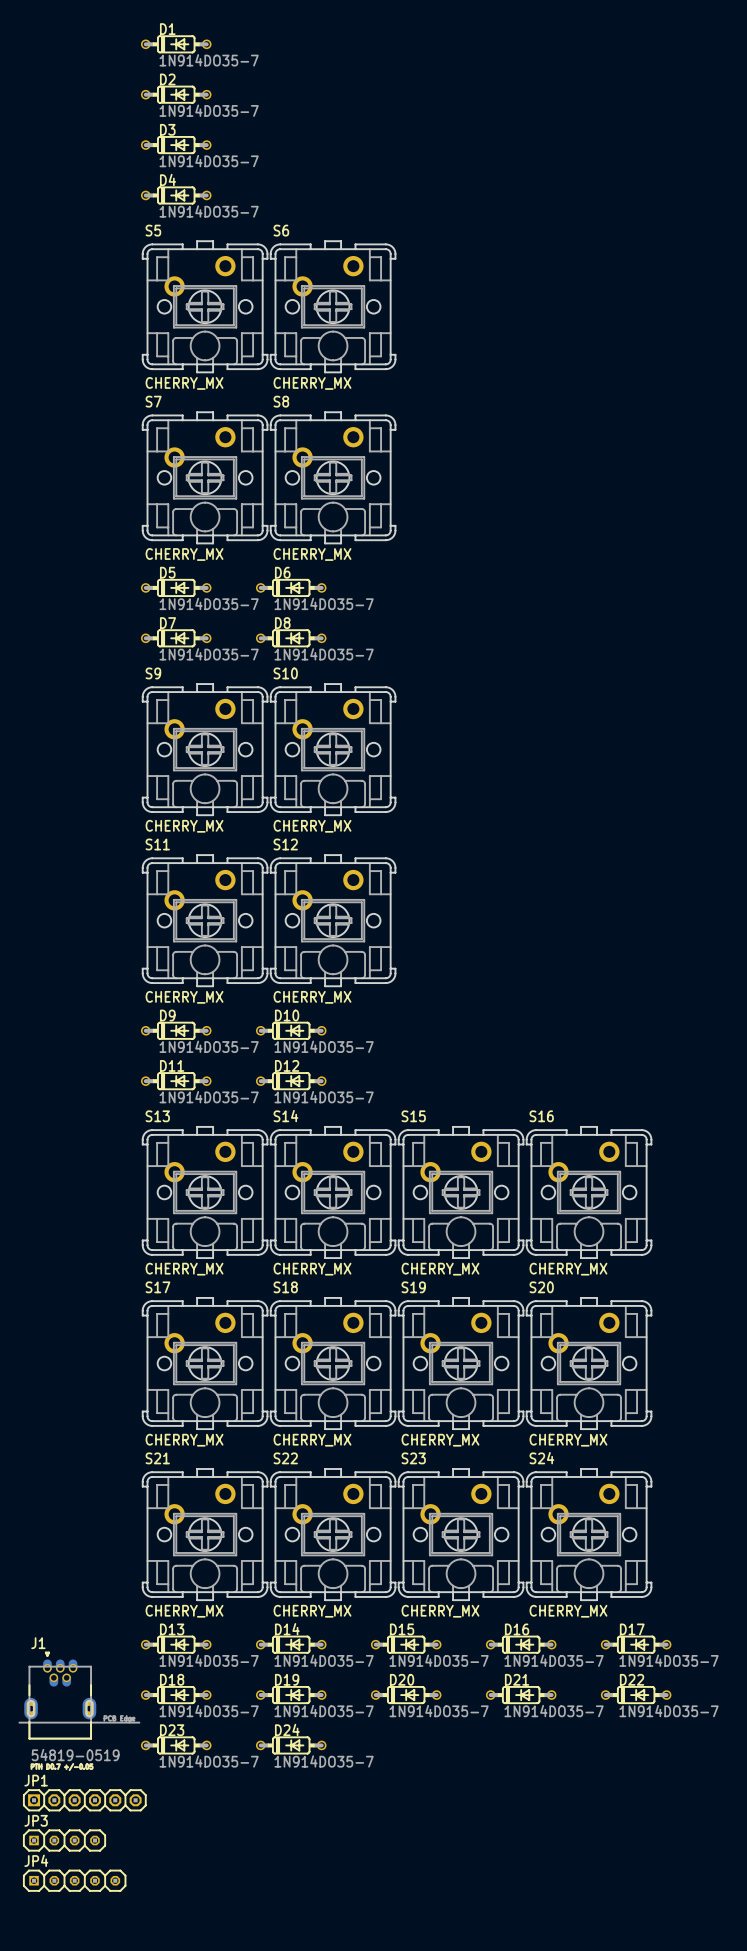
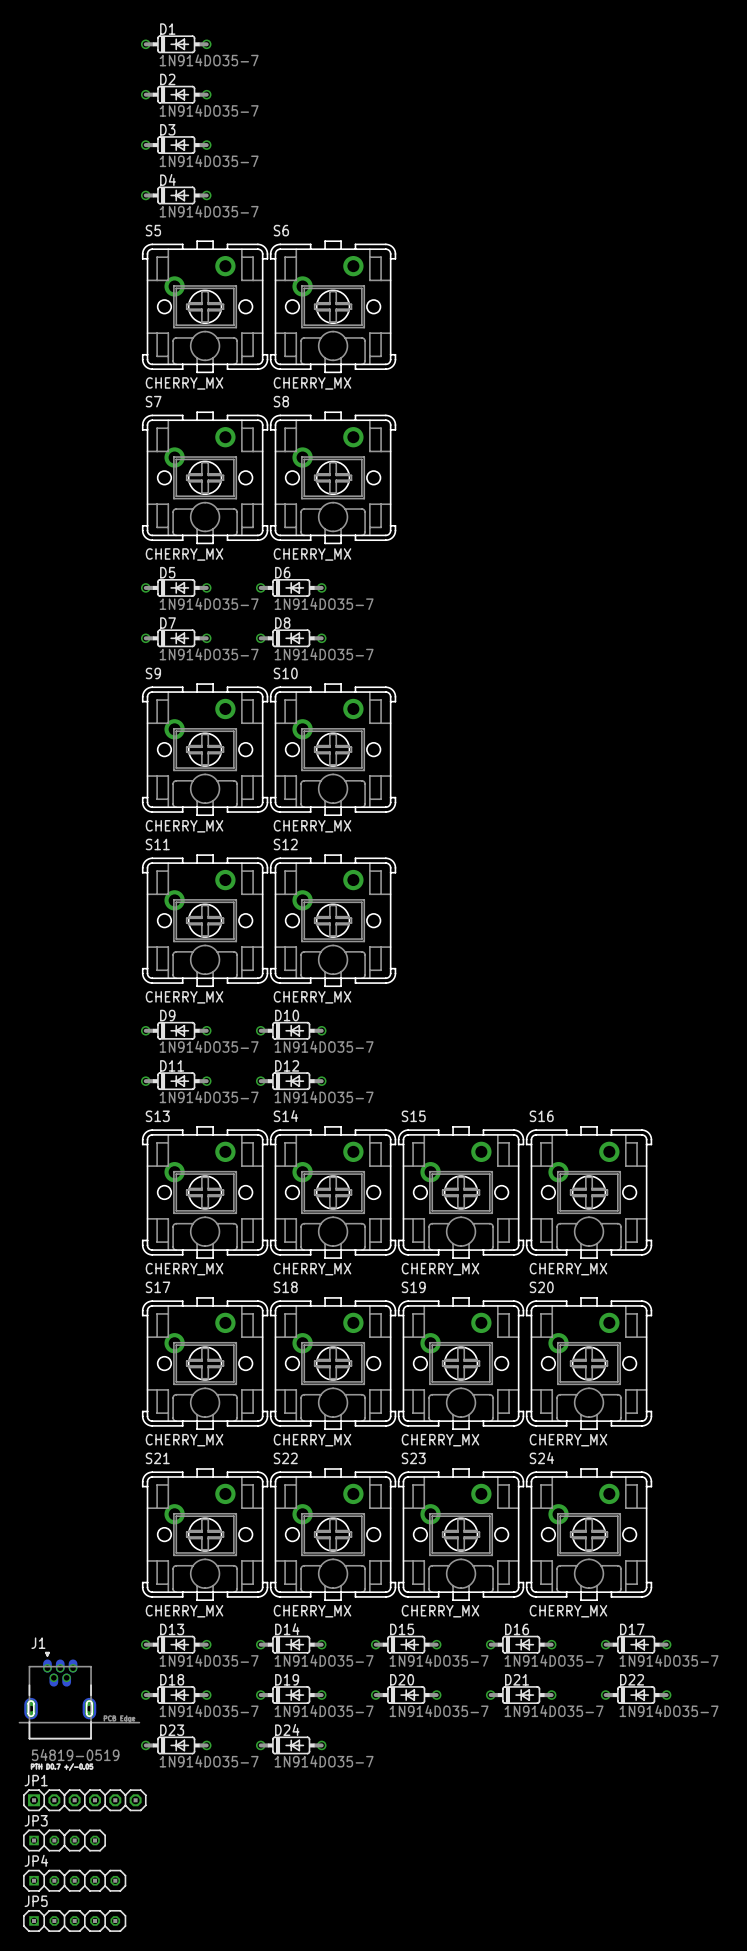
JP5: none -> (74, 1920)

